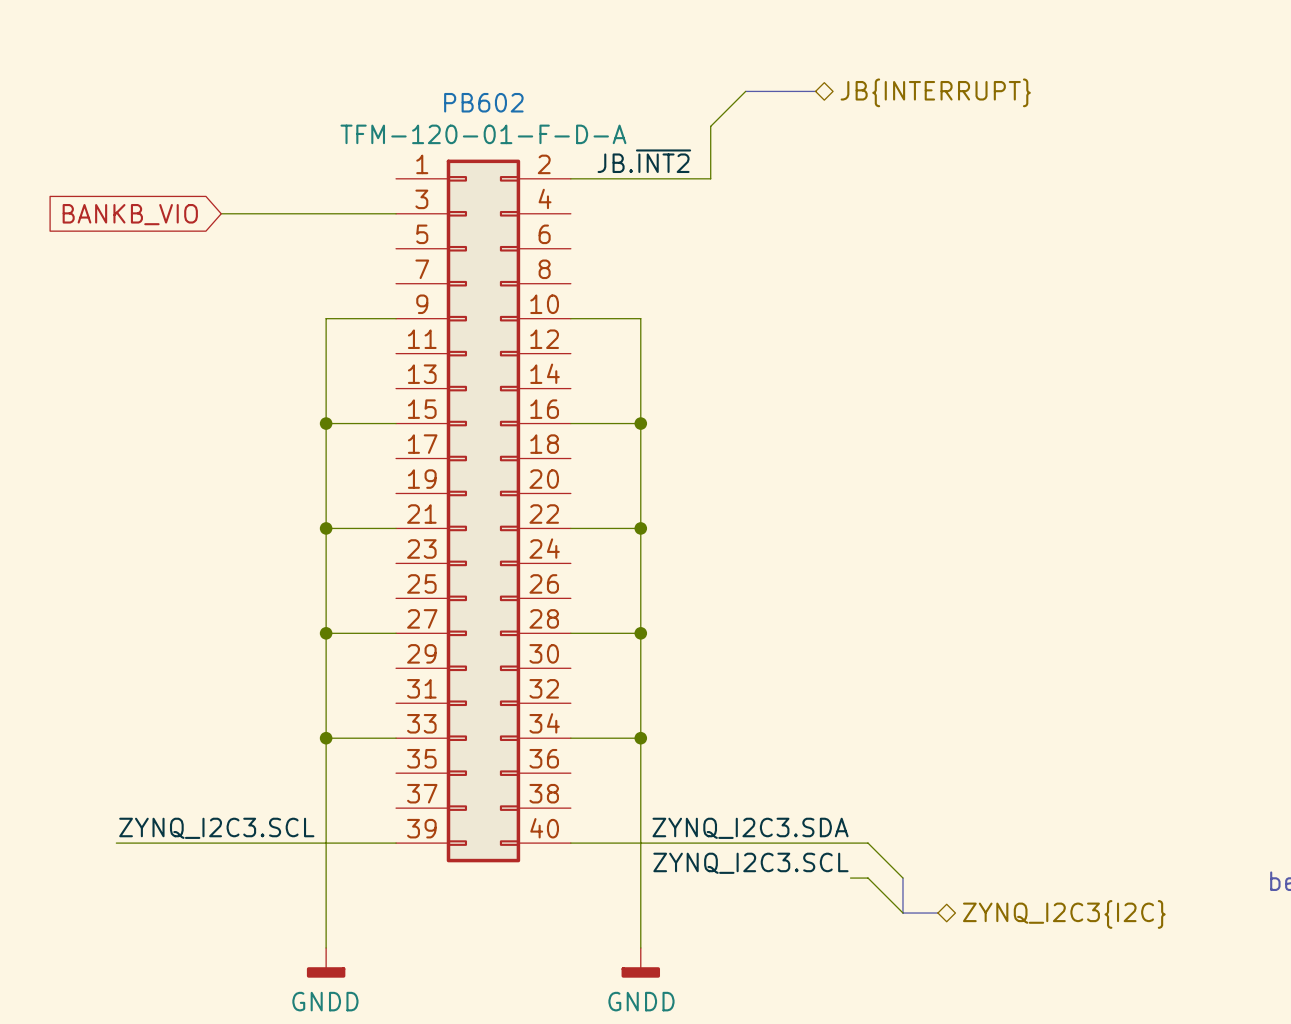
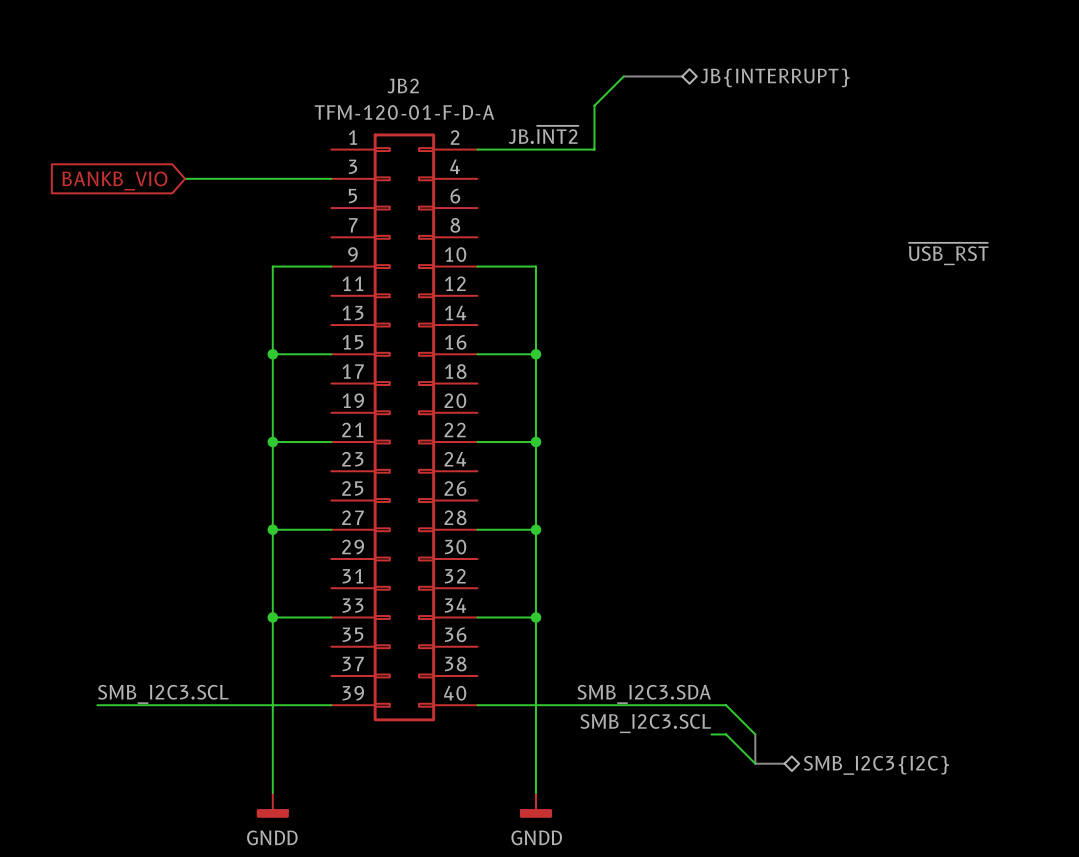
PB602 name: PB602 (483, 102) -> JB2 (403, 86)
label: none -> ~{USB_RST} (948, 254)
label: ZYNQ_I2C3.SCL (216, 828) -> SMB_I2C3.SCL (163, 694)
label: ZYNQ_I2C3.SDA (750, 828) -> SMB_I2C3.SDA (644, 694)
label: ZYNQ_I2C3.SCL (750, 863) -> SMB_I2C3.SCL (645, 723)
hierarchical label: ZYNQ_I2C3{I2C} (1064, 914) -> SMB_I2C3{I2C} (876, 765)

